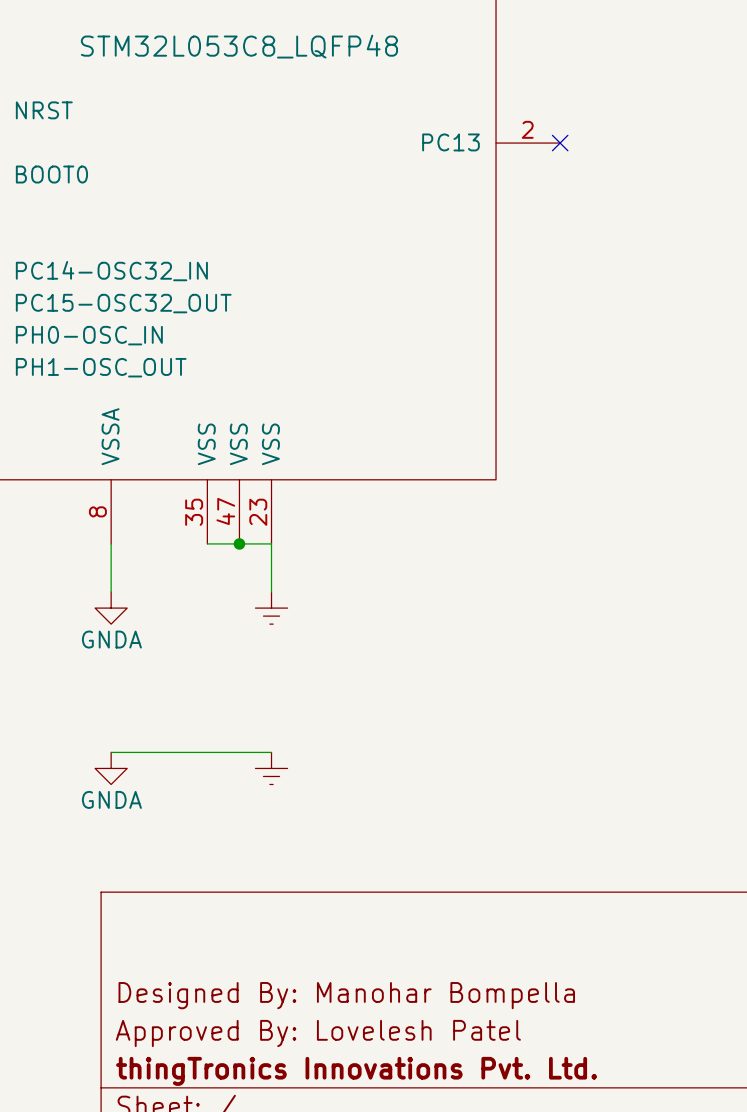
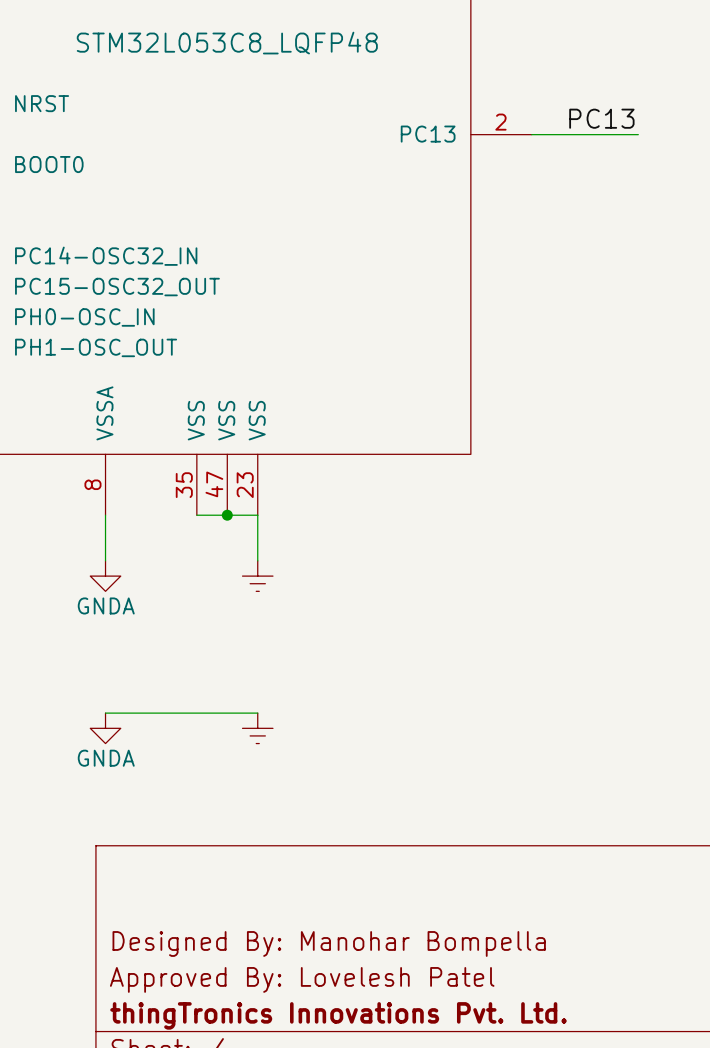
label: none -> PC13 (601, 118)
wire: none -> (531, 134) (638, 134)
no-connect mark: (560, 143) -> none

